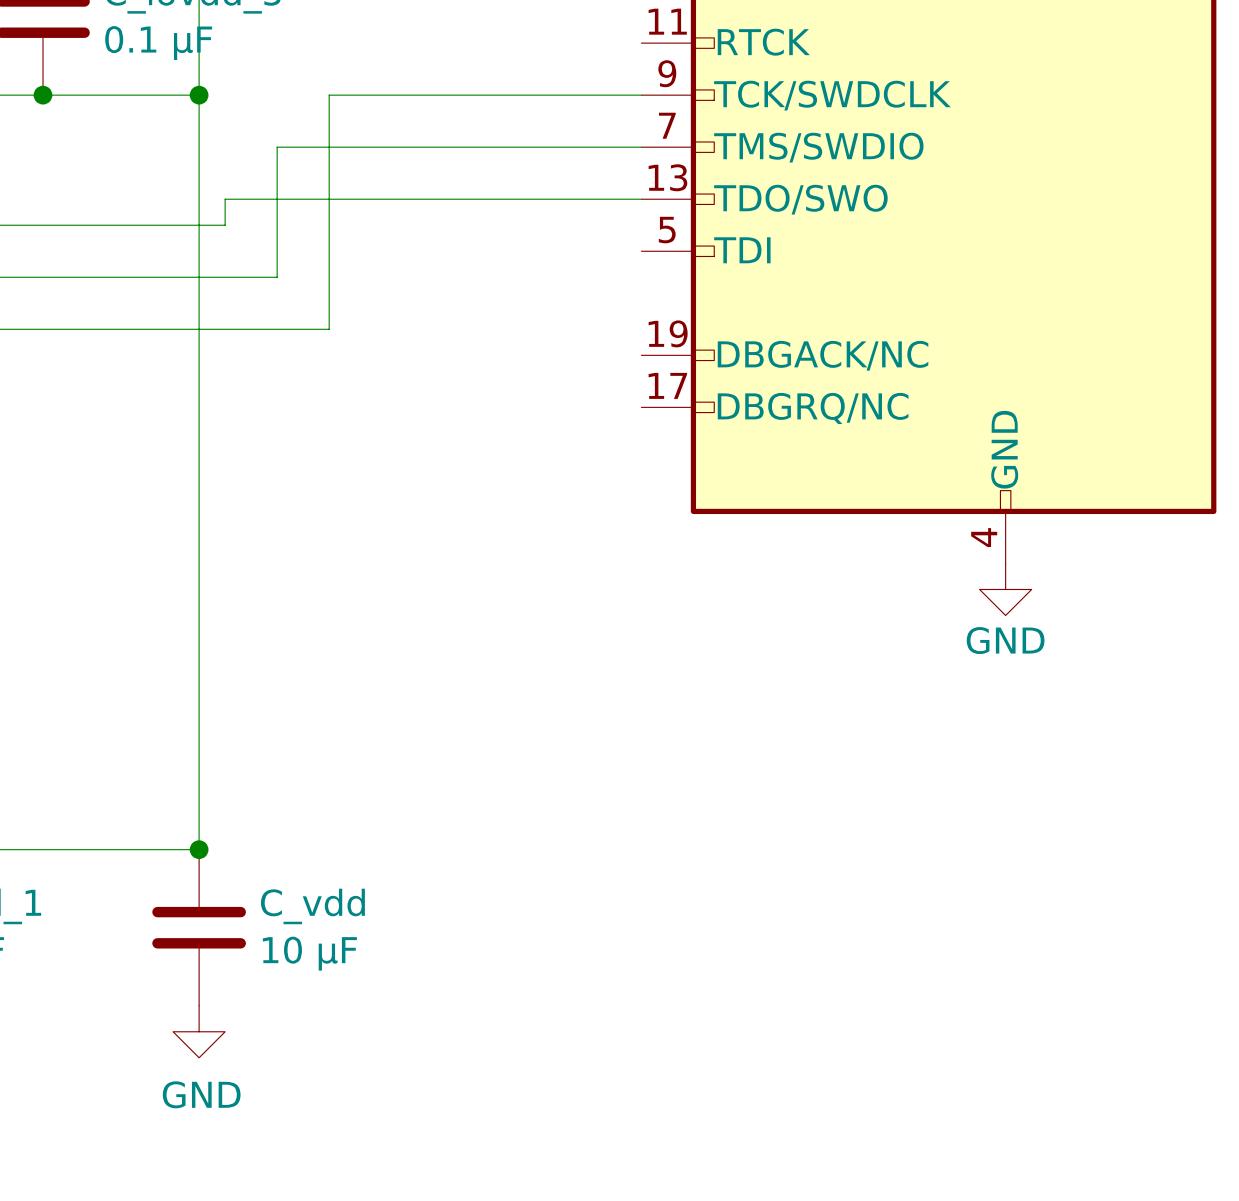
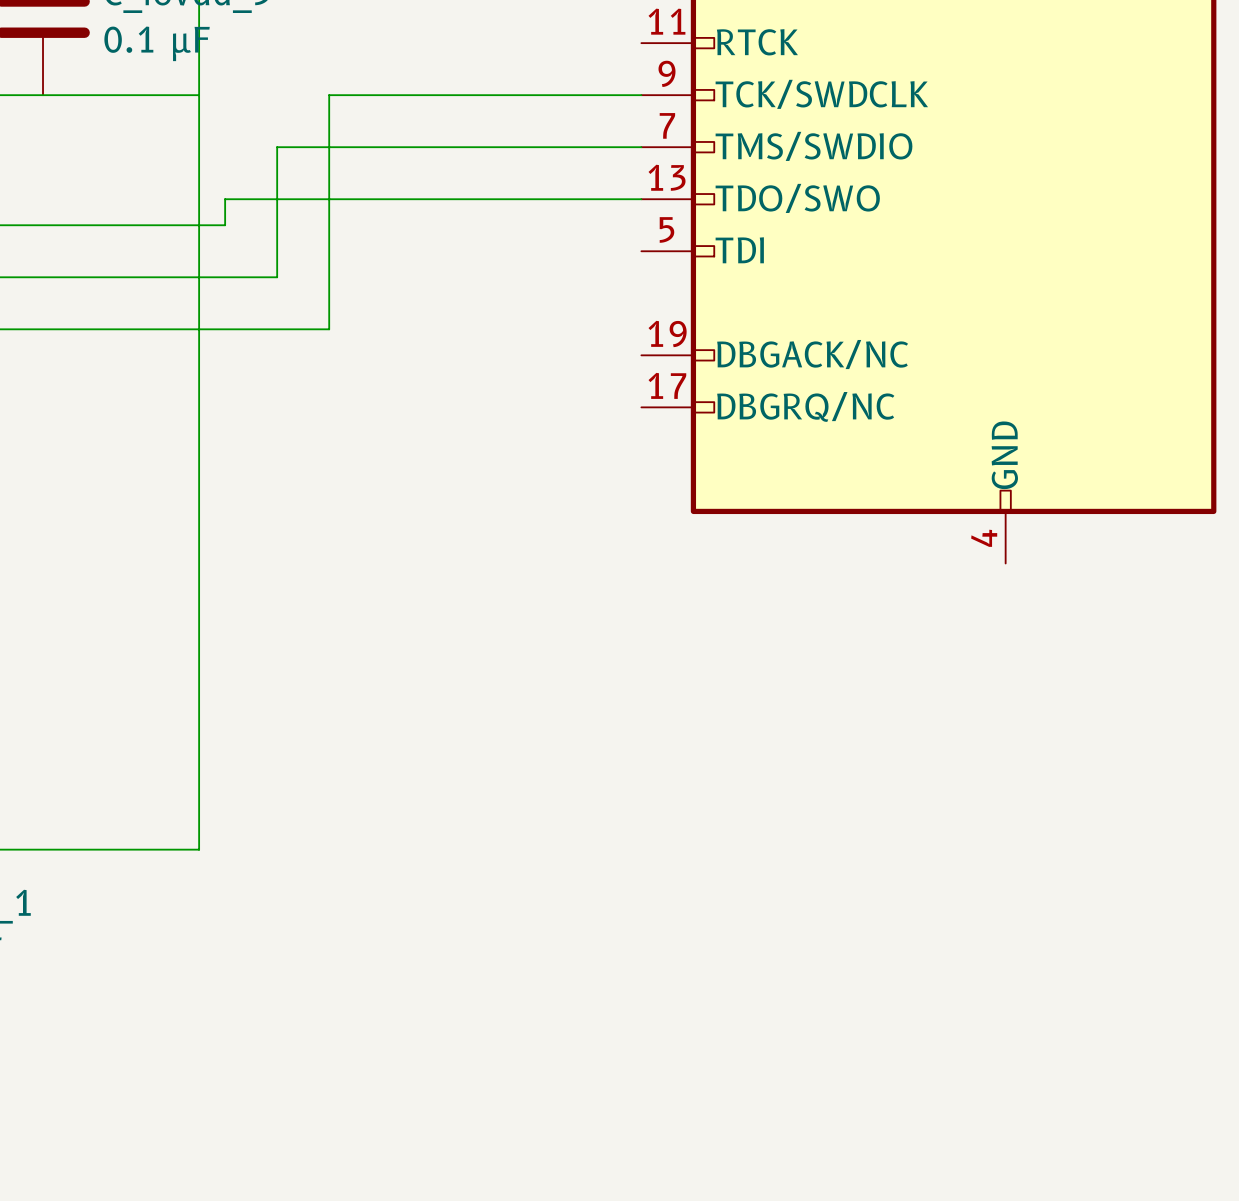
junction: (43, 95) -> none
junction: (199, 95) -> none
power symbol: GND (1005, 589) -> none
junction: (199, 849) -> none
C_vdd: 10 µF (199, 927) -> none
power symbol: GND (199, 1031) -> none

